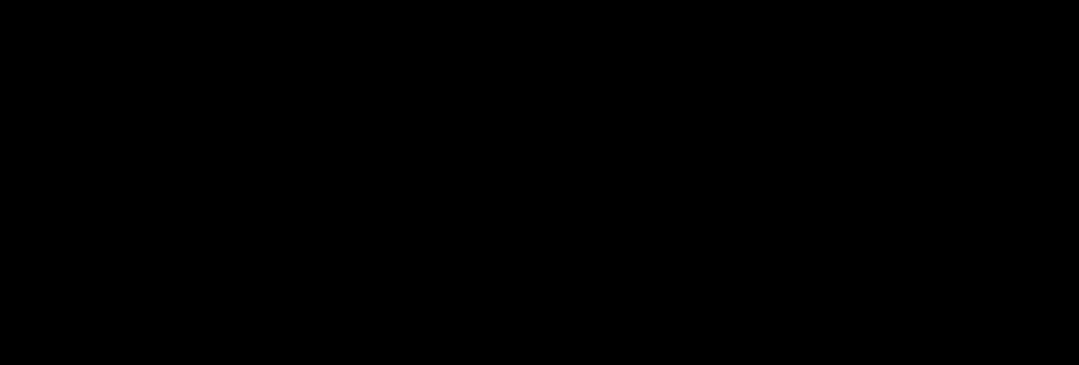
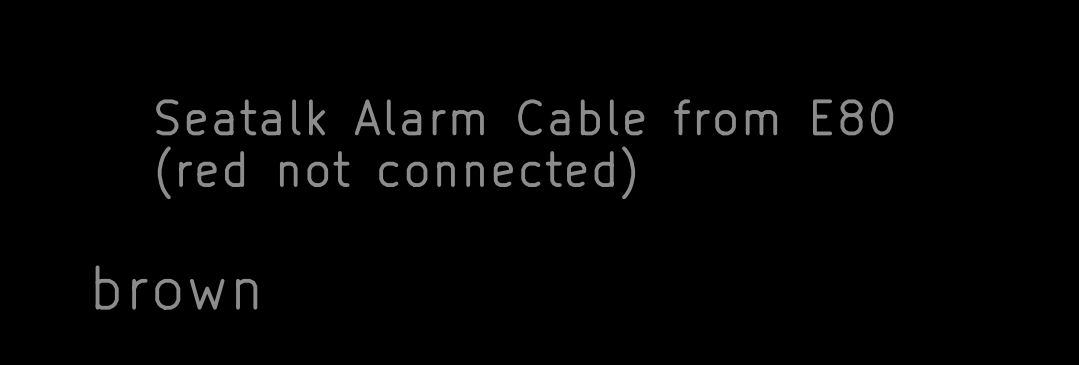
text: none -> Seatalk Alarm Cable from E80 (524, 117)
text: none -> (red not connected) (396, 172)
text: none -> brown (176, 287)

